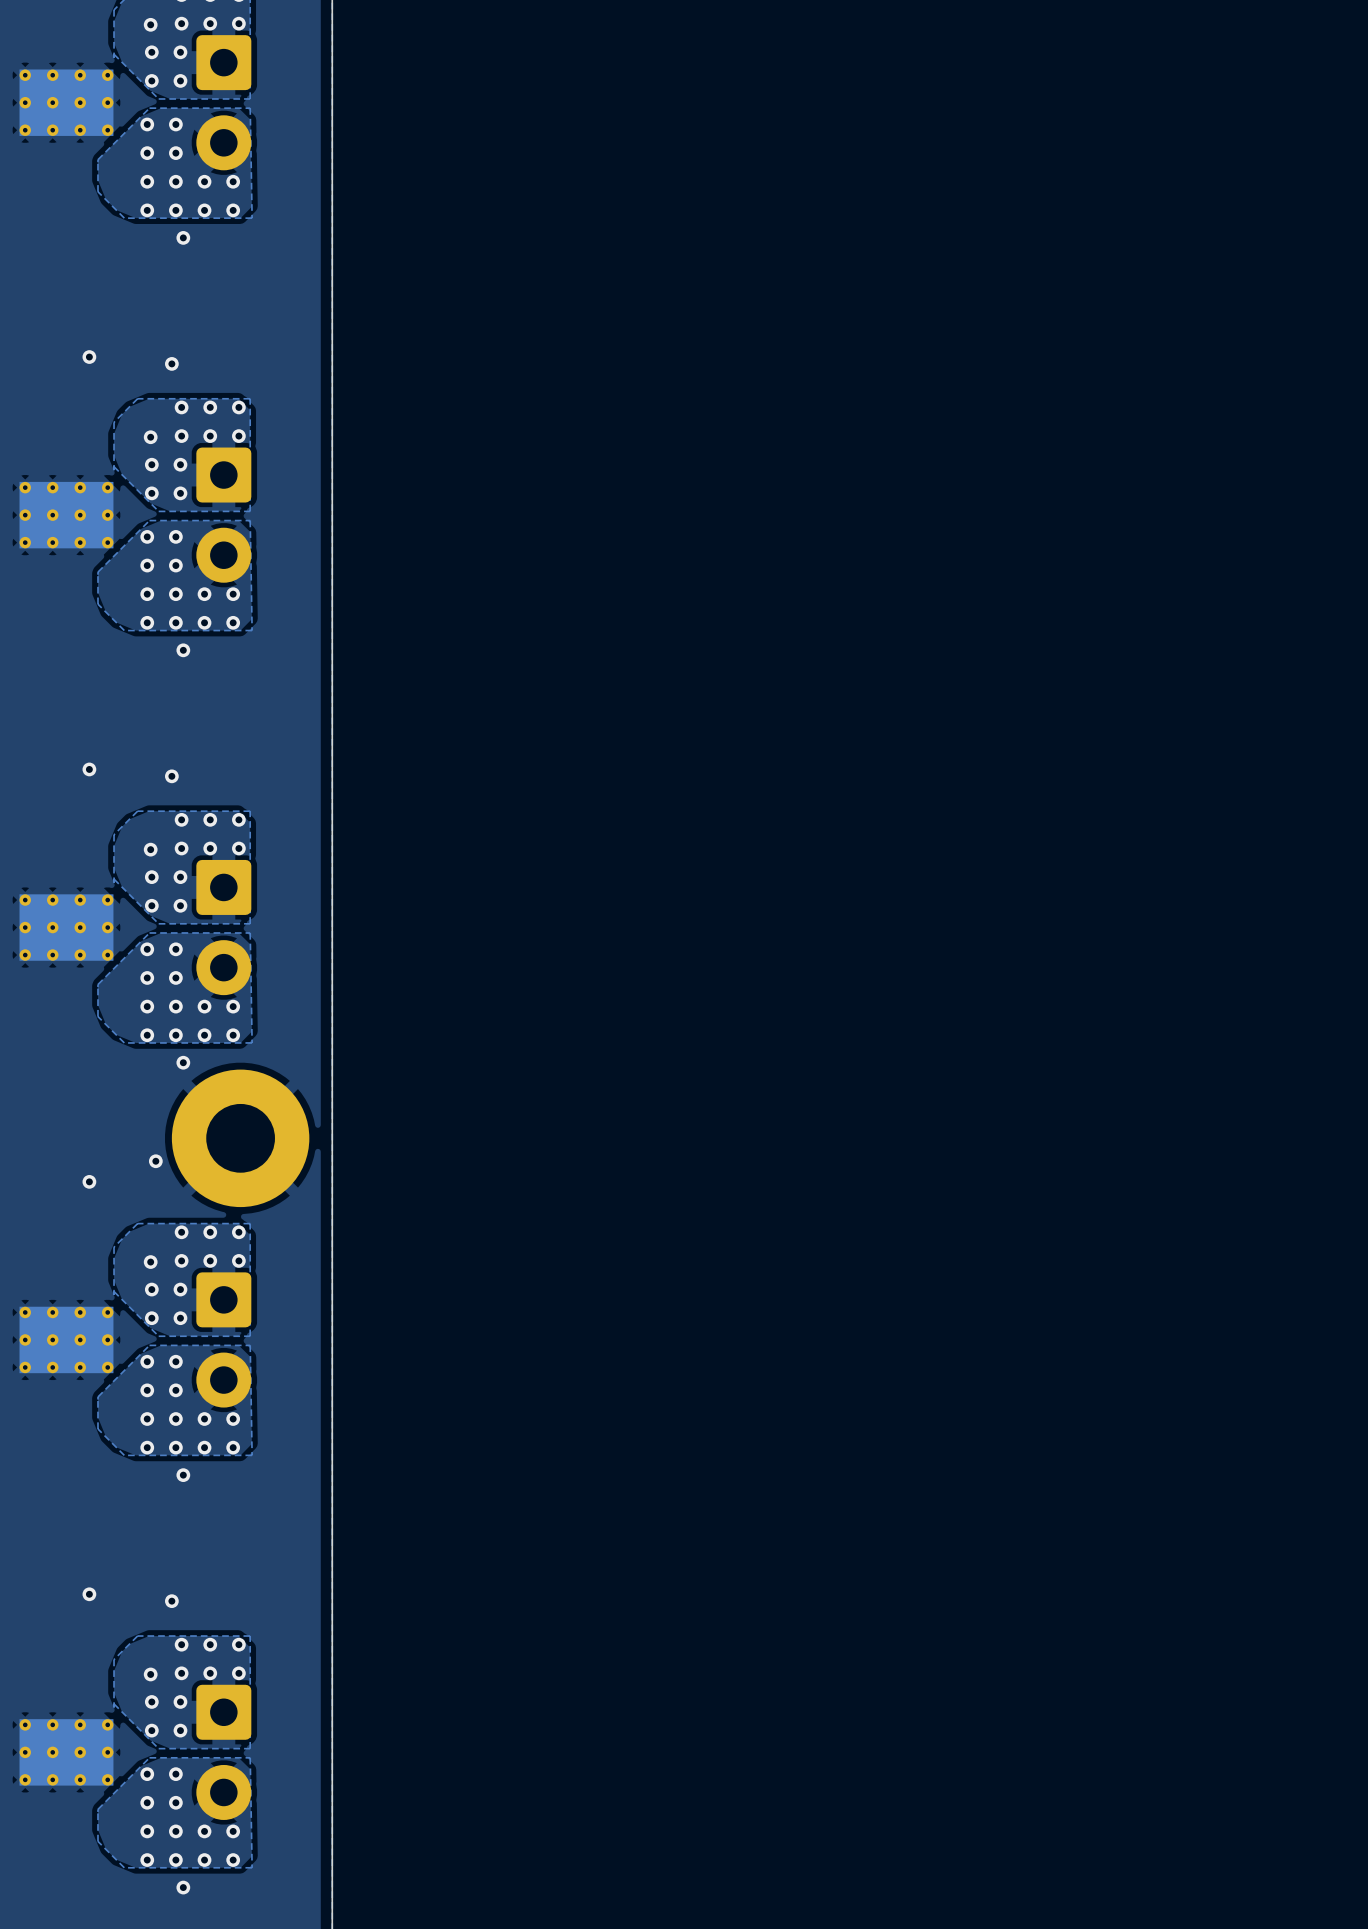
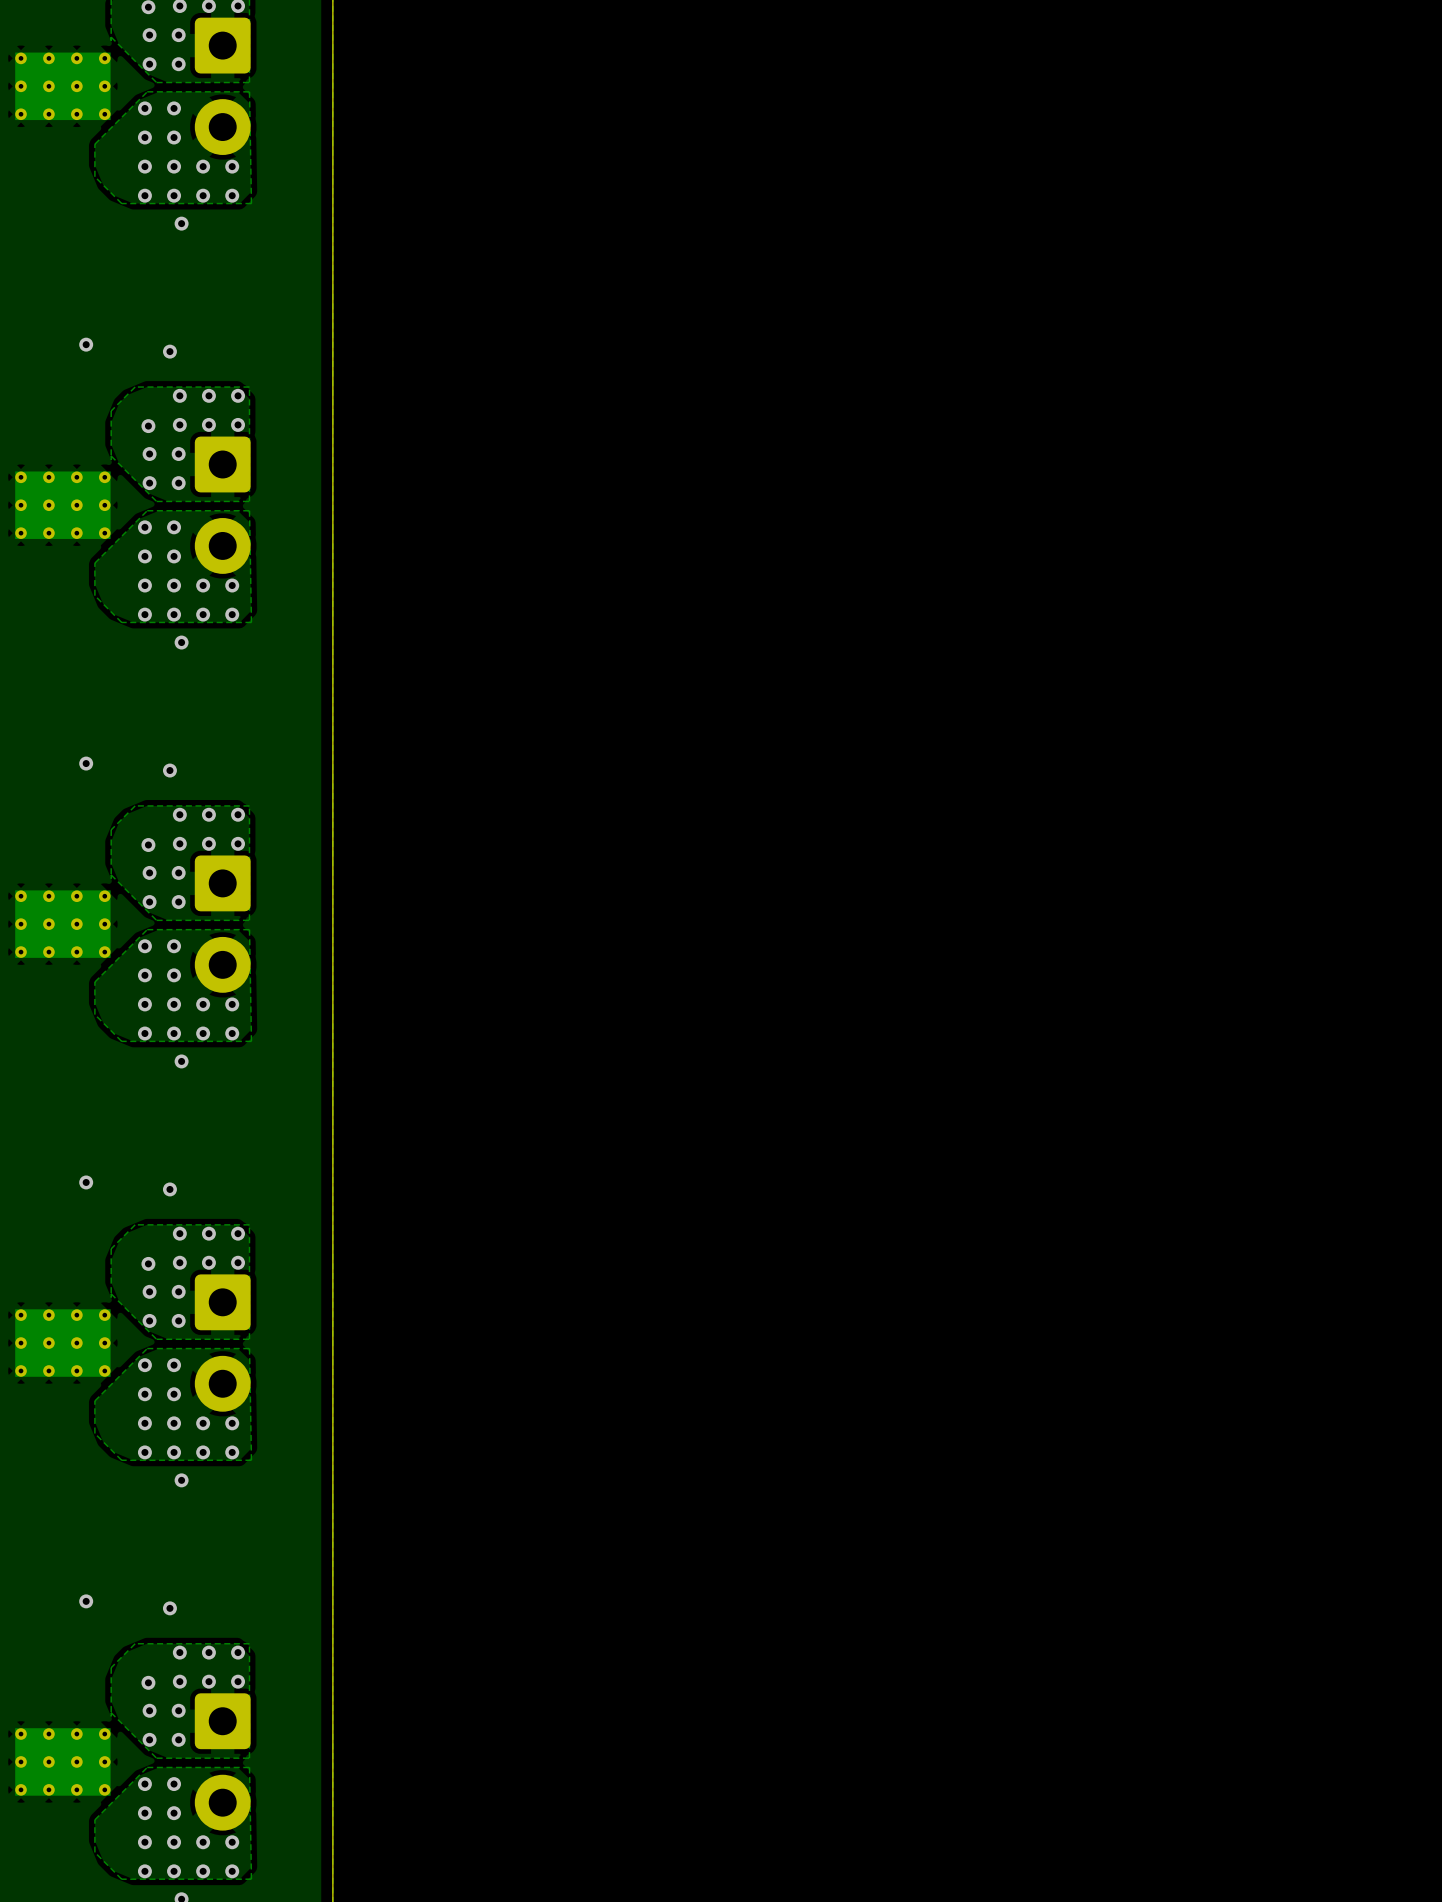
part: (240, 1138) -> none
via position: (155, 1161) -> (169, 1189)

